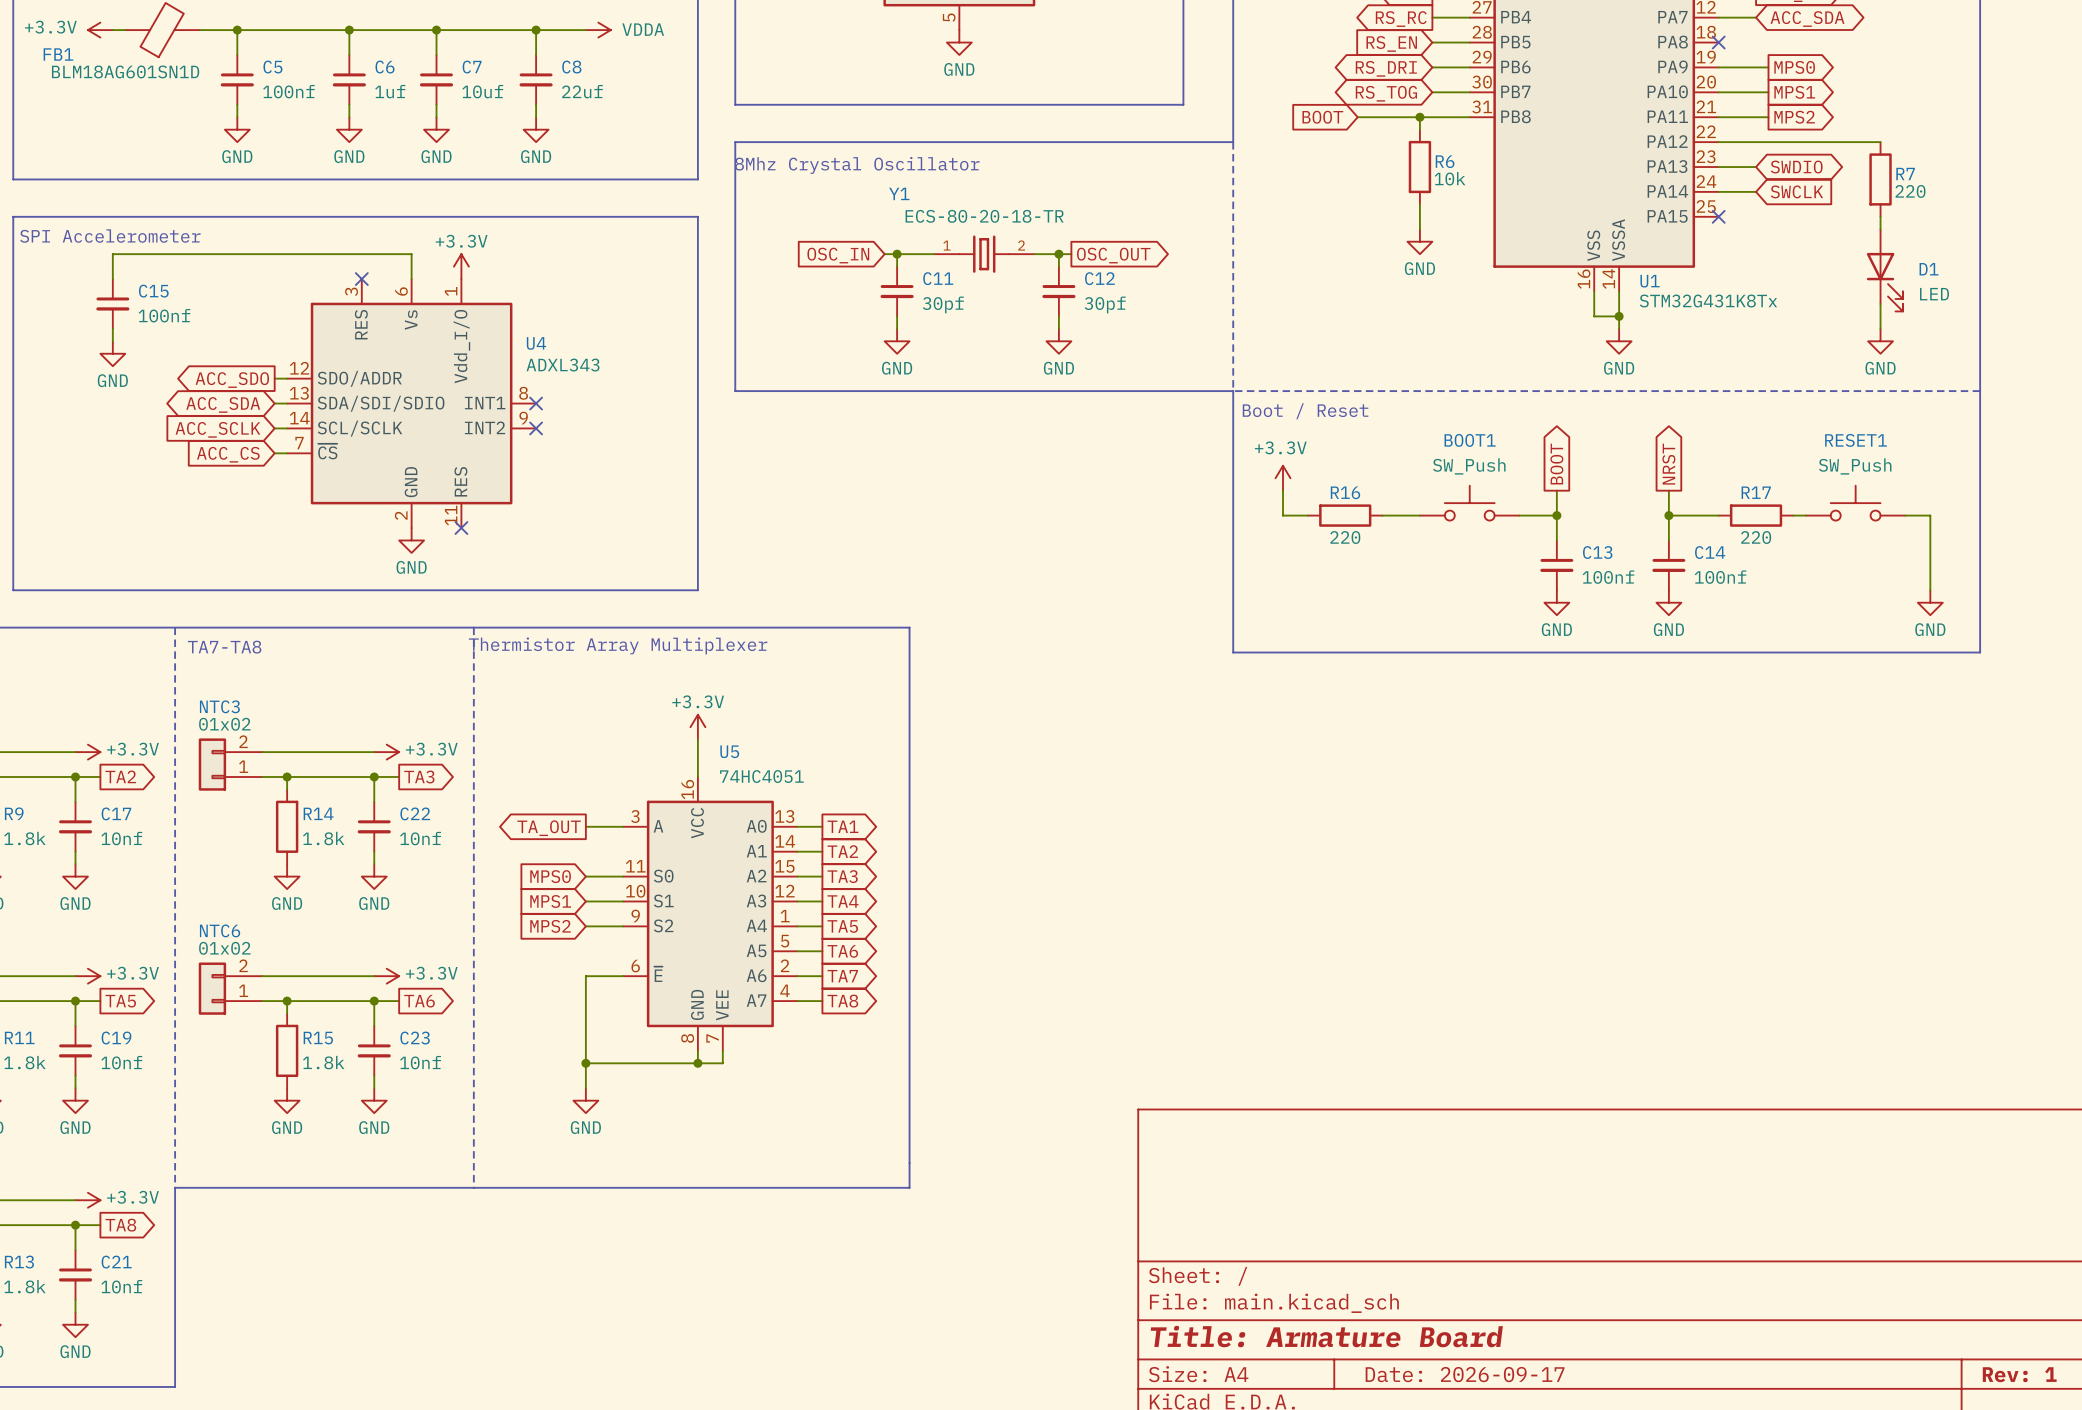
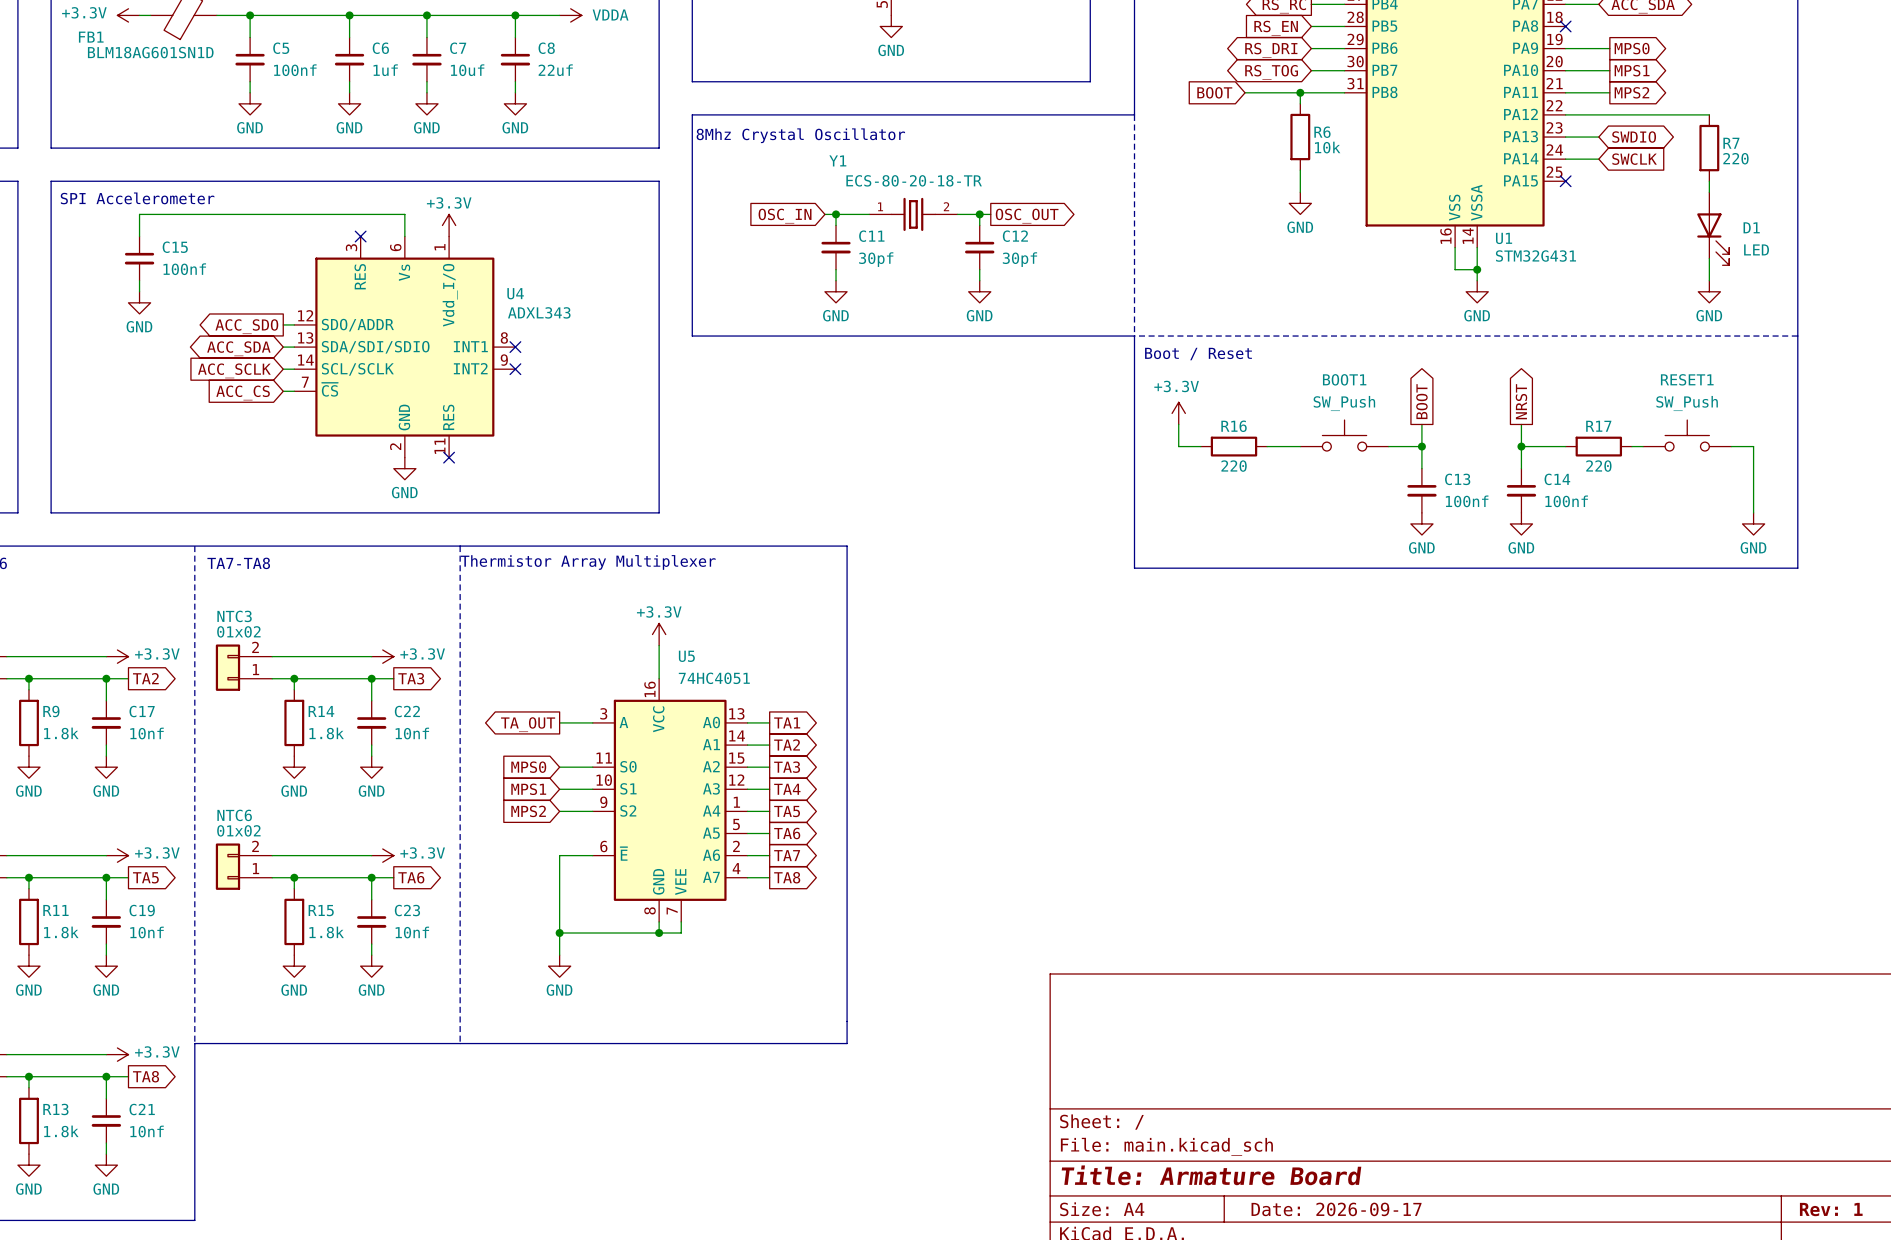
U1 value: STM32G431K8Tx (1708, 301) -> STM32G431 (1535, 256)

